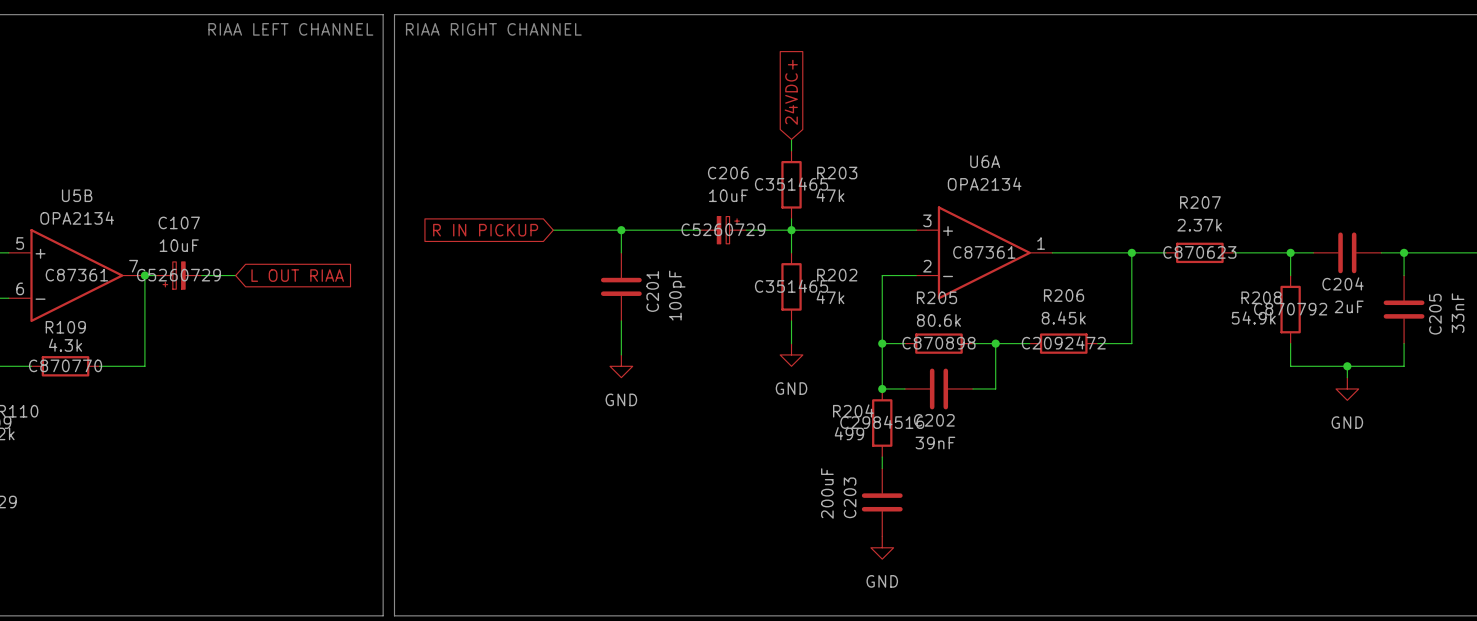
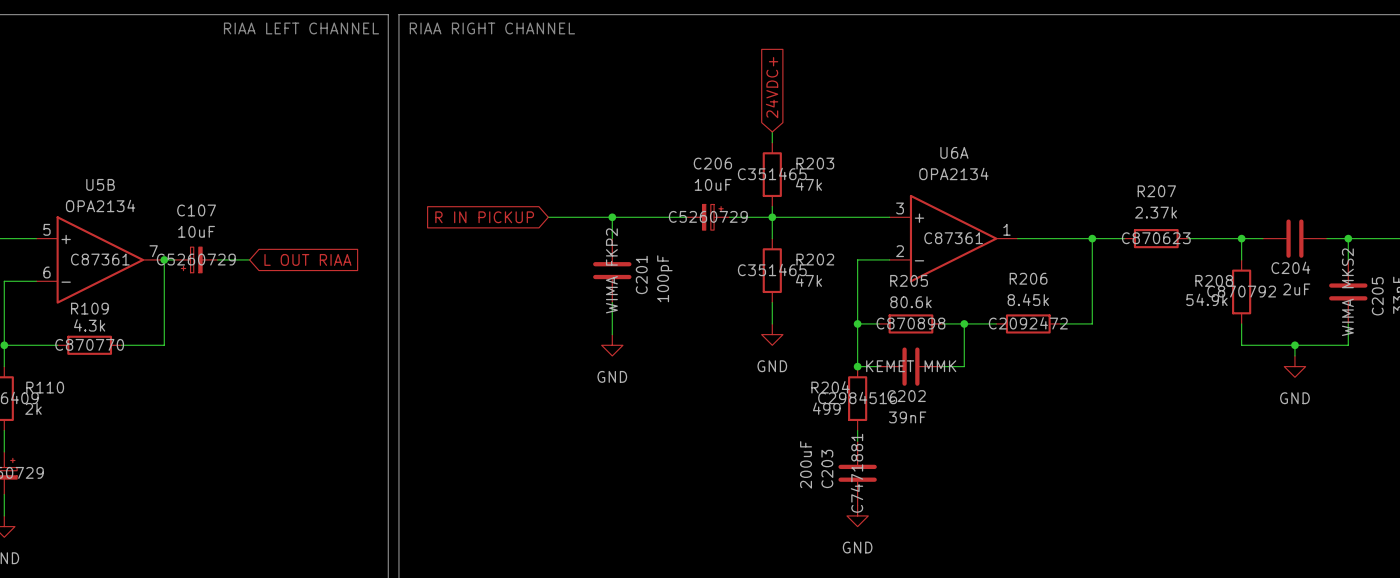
C201 text: none -> WIMA FKP2 (611, 270)
C205 text: none -> WIMA MKS2 (1347, 292)
C202 text: none -> KEMET MMK (911, 366)
C203 text: none -> C7471881 (856, 473)

